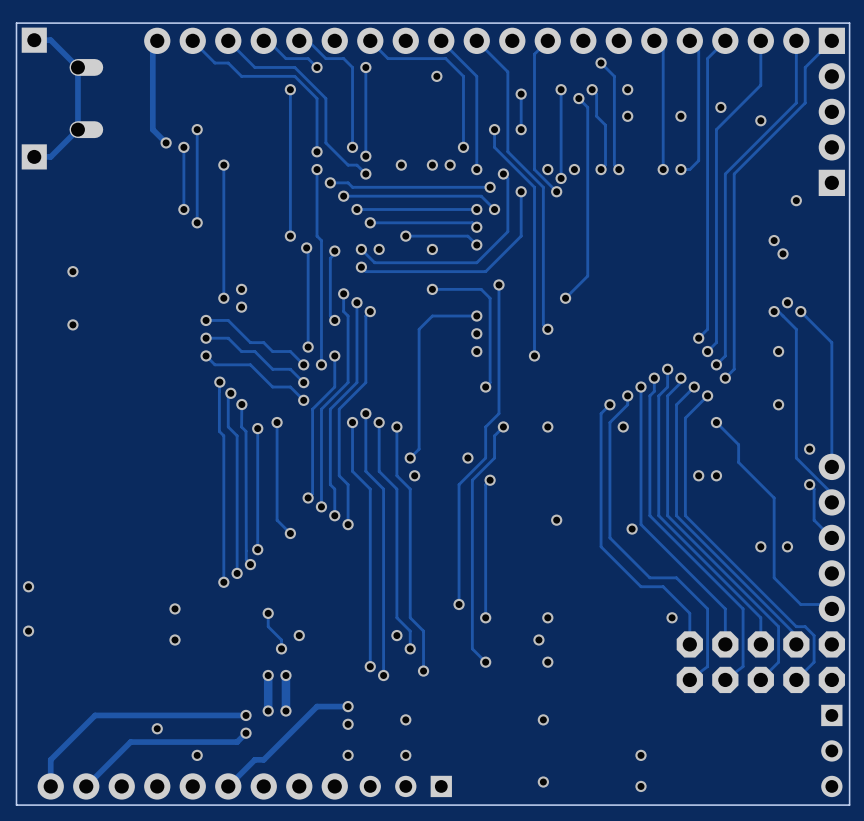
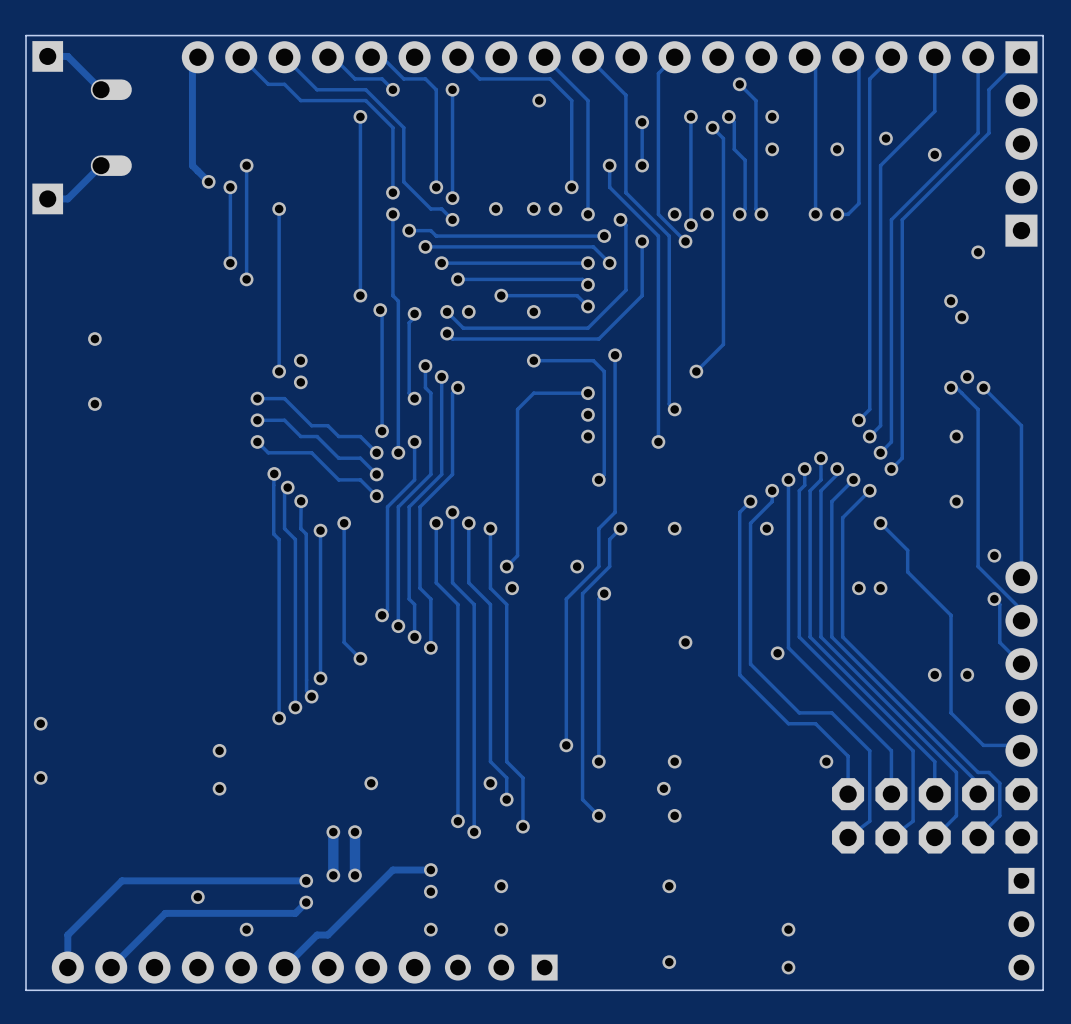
track: (77, 67) (77, 129) -> none
track: (268, 613) (268, 626) (281, 639) (281, 648) -> none
via: (268, 613) -> none
via: (281, 648) -> none

